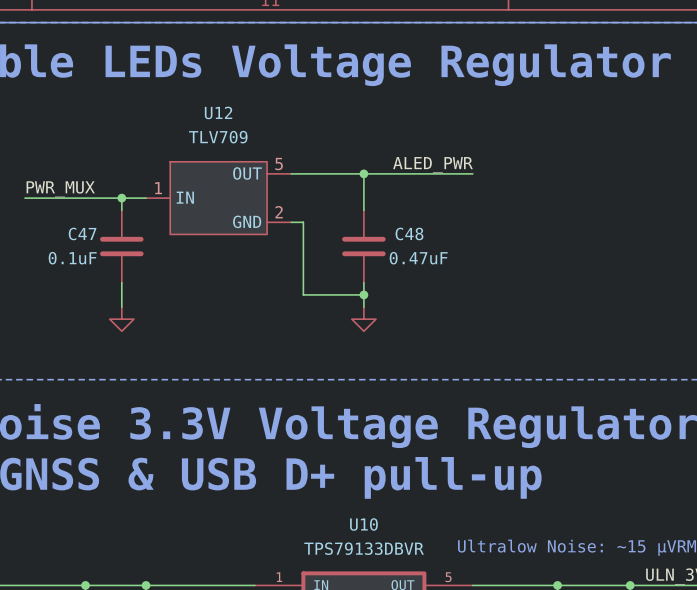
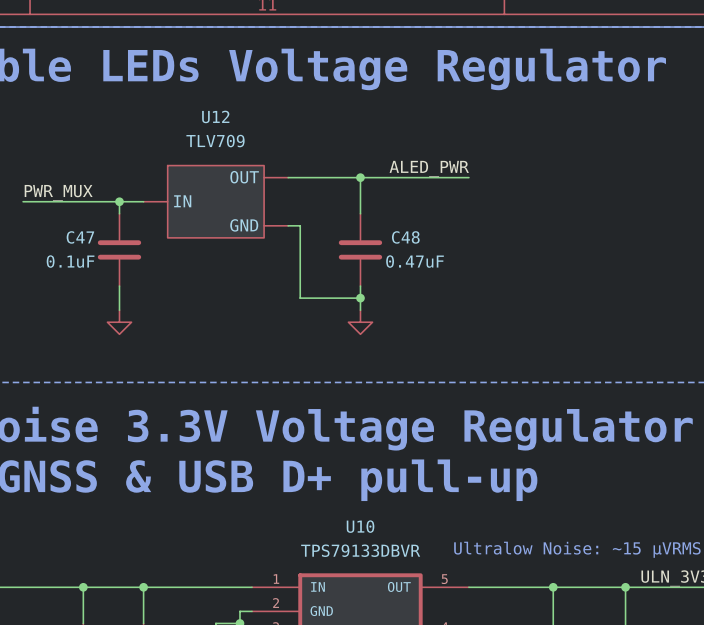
U12 pin number: 5 (279, 164) -> none
U12 pin number: 1 (158, 188) -> none
U12 pin number: 2 (279, 212) -> none

